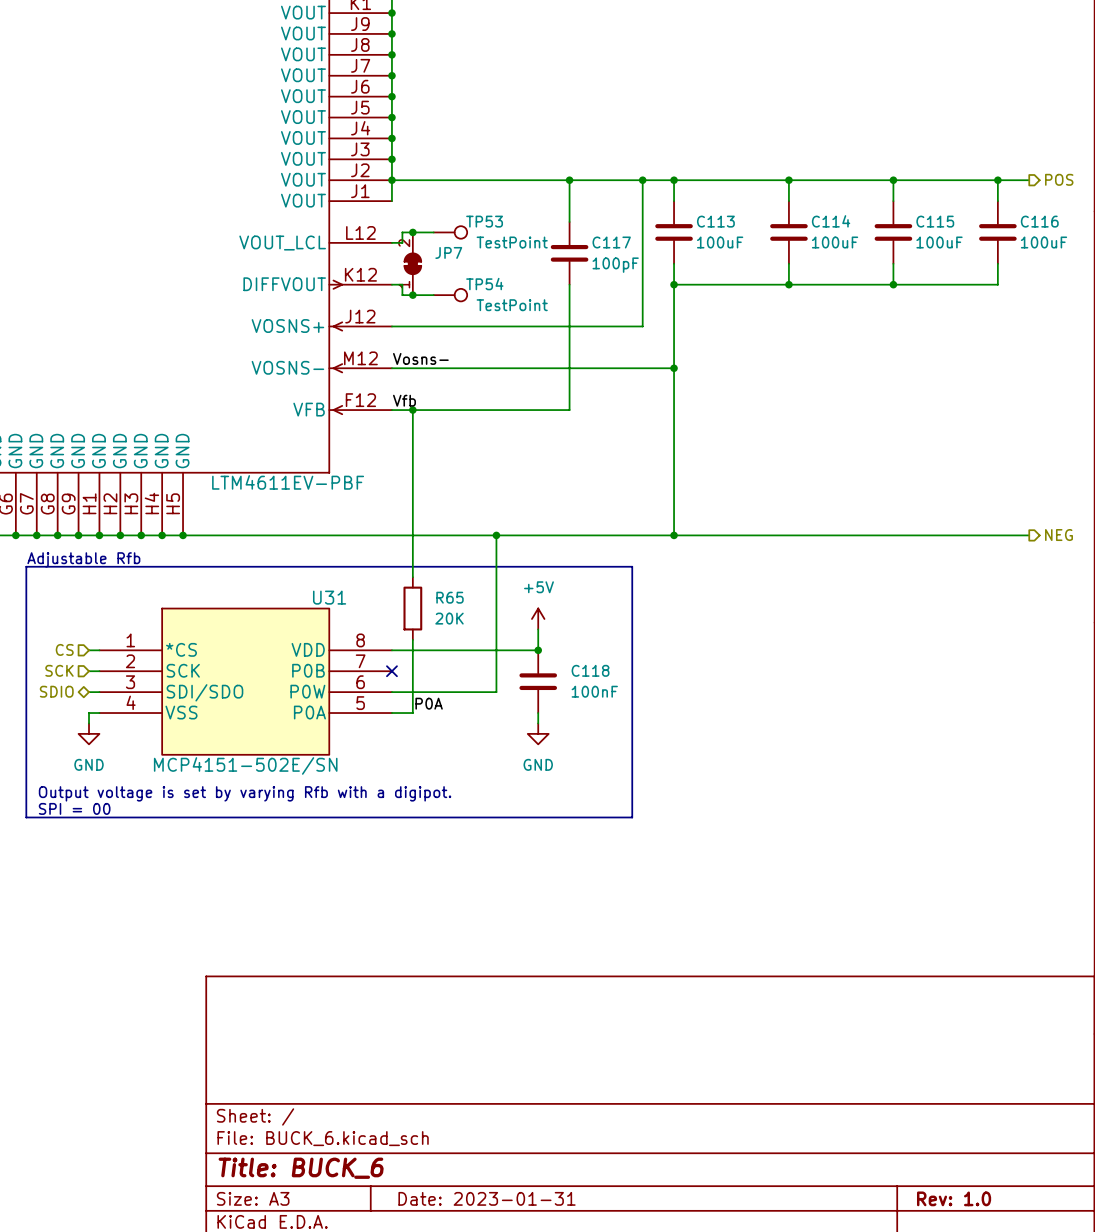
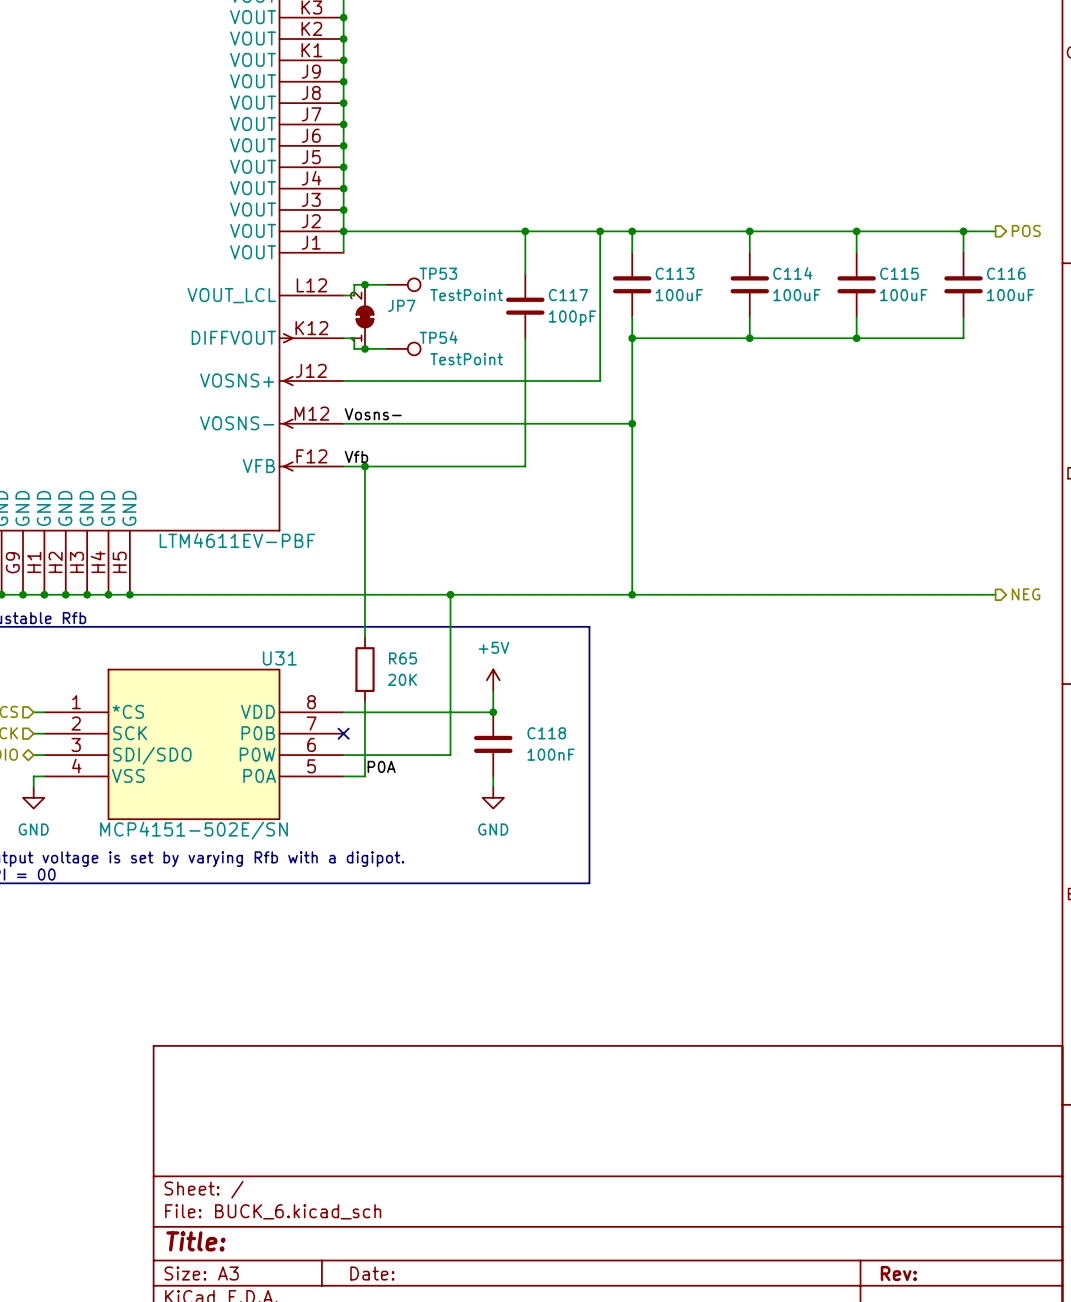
title block: Title: BUCK_6 (301, 1168) -> Title: (195, 1241)
title block: Date: 2023-01-31 (487, 1198) -> Date: (372, 1273)
title block: Rev: 1.0 (954, 1198) -> Rev: (898, 1273)

